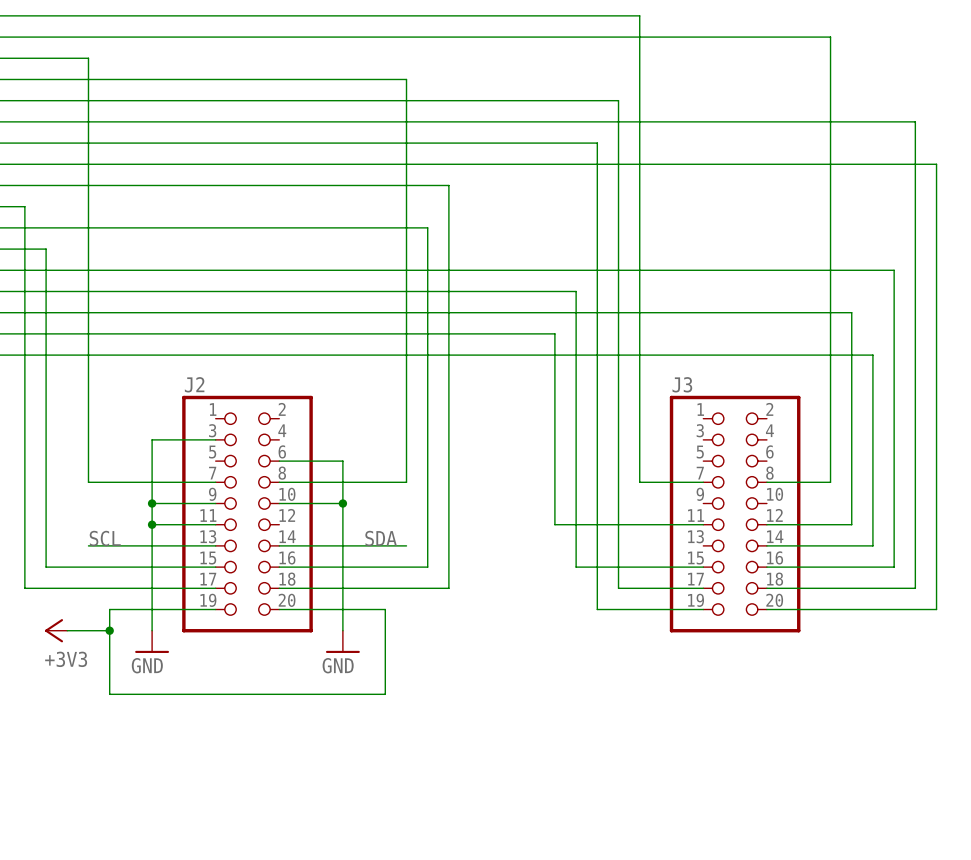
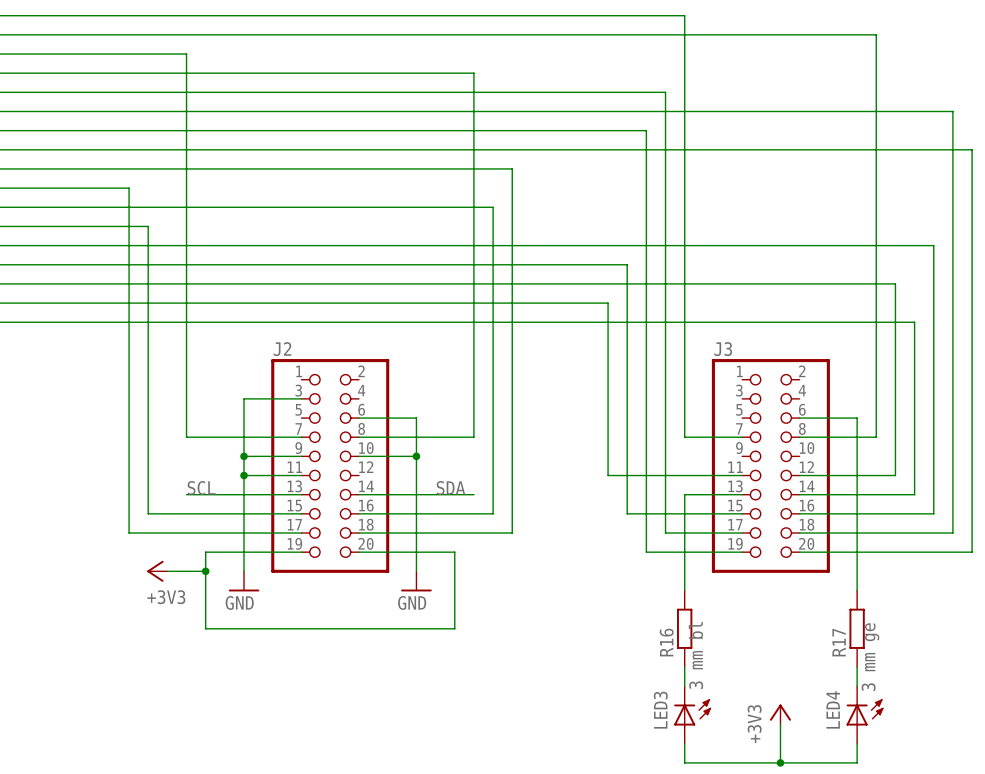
wire: (830, 37) (830, 461) -> (857, 34) (876, 34) (876, 283) (895, 283) (895, 322) (914, 322)
wire: (915, 121) (915, 270) -> (933, 111) (952, 111) (952, 149) (972, 149) (972, 552) (952, 552)
wire: (894, 270) (894, 355) -> (914, 245) (933, 245)
wire: none -> (799, 418) (857, 418)
wire: (851, 482) (851, 524) -> (876, 437) (857, 437) (857, 590)
wire: (872, 524) (872, 545) -> (895, 475) (876, 475)
wire: none -> (742, 494) (684, 494) (684, 590)
wire: none -> (895, 494) (914, 494)
wire: (894, 545) (894, 567) -> (933, 513) (914, 513)
wire: (915, 567) (915, 588) -> (857, 667) (857, 686)
wire: (936, 588) (936, 609) -> (952, 533) (933, 533)
R16: none -> (684, 628)
R17: none -> (857, 628)
wire: none -> (684, 667) (684, 686)
LED3: none -> 3 mm bl (692, 715)
power symbol: none -> +3V3 (780, 714)
LED4: none -> 3 mm ge (865, 715)
wire: none -> (780, 724) (780, 762)
wire: none -> (684, 743) (684, 762) (857, 762) (857, 743)
junction: none -> (780, 762)

